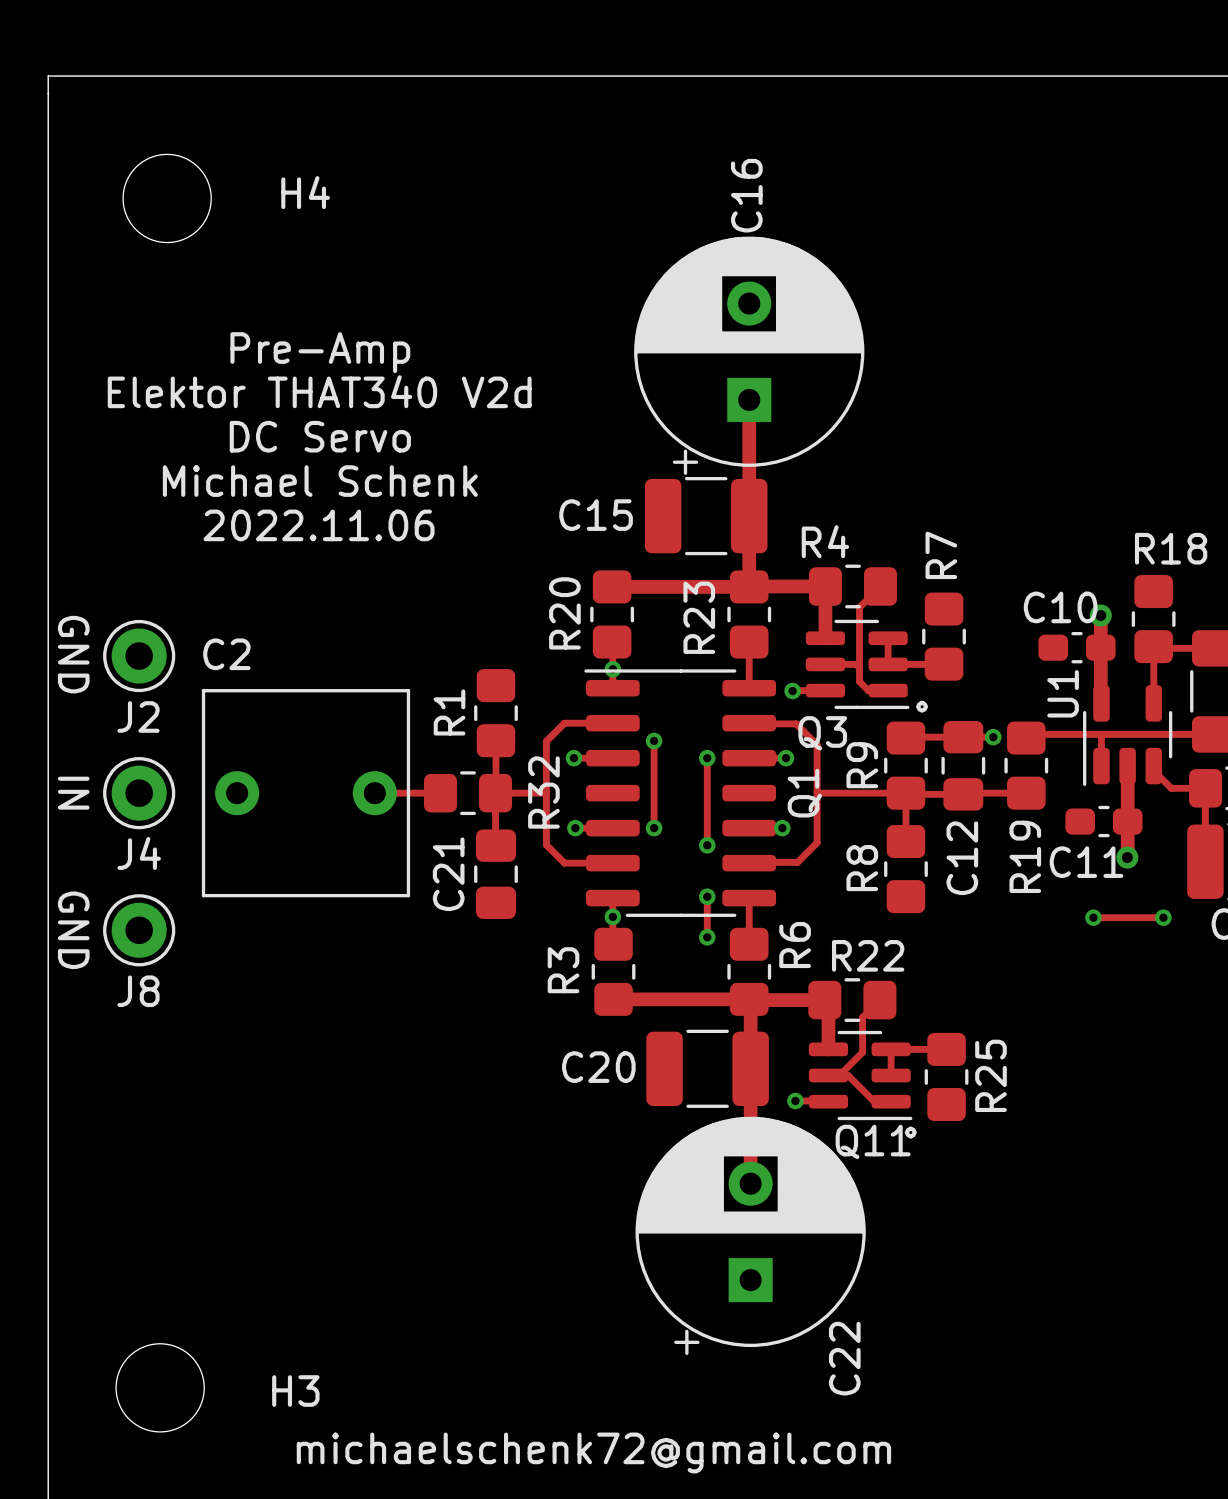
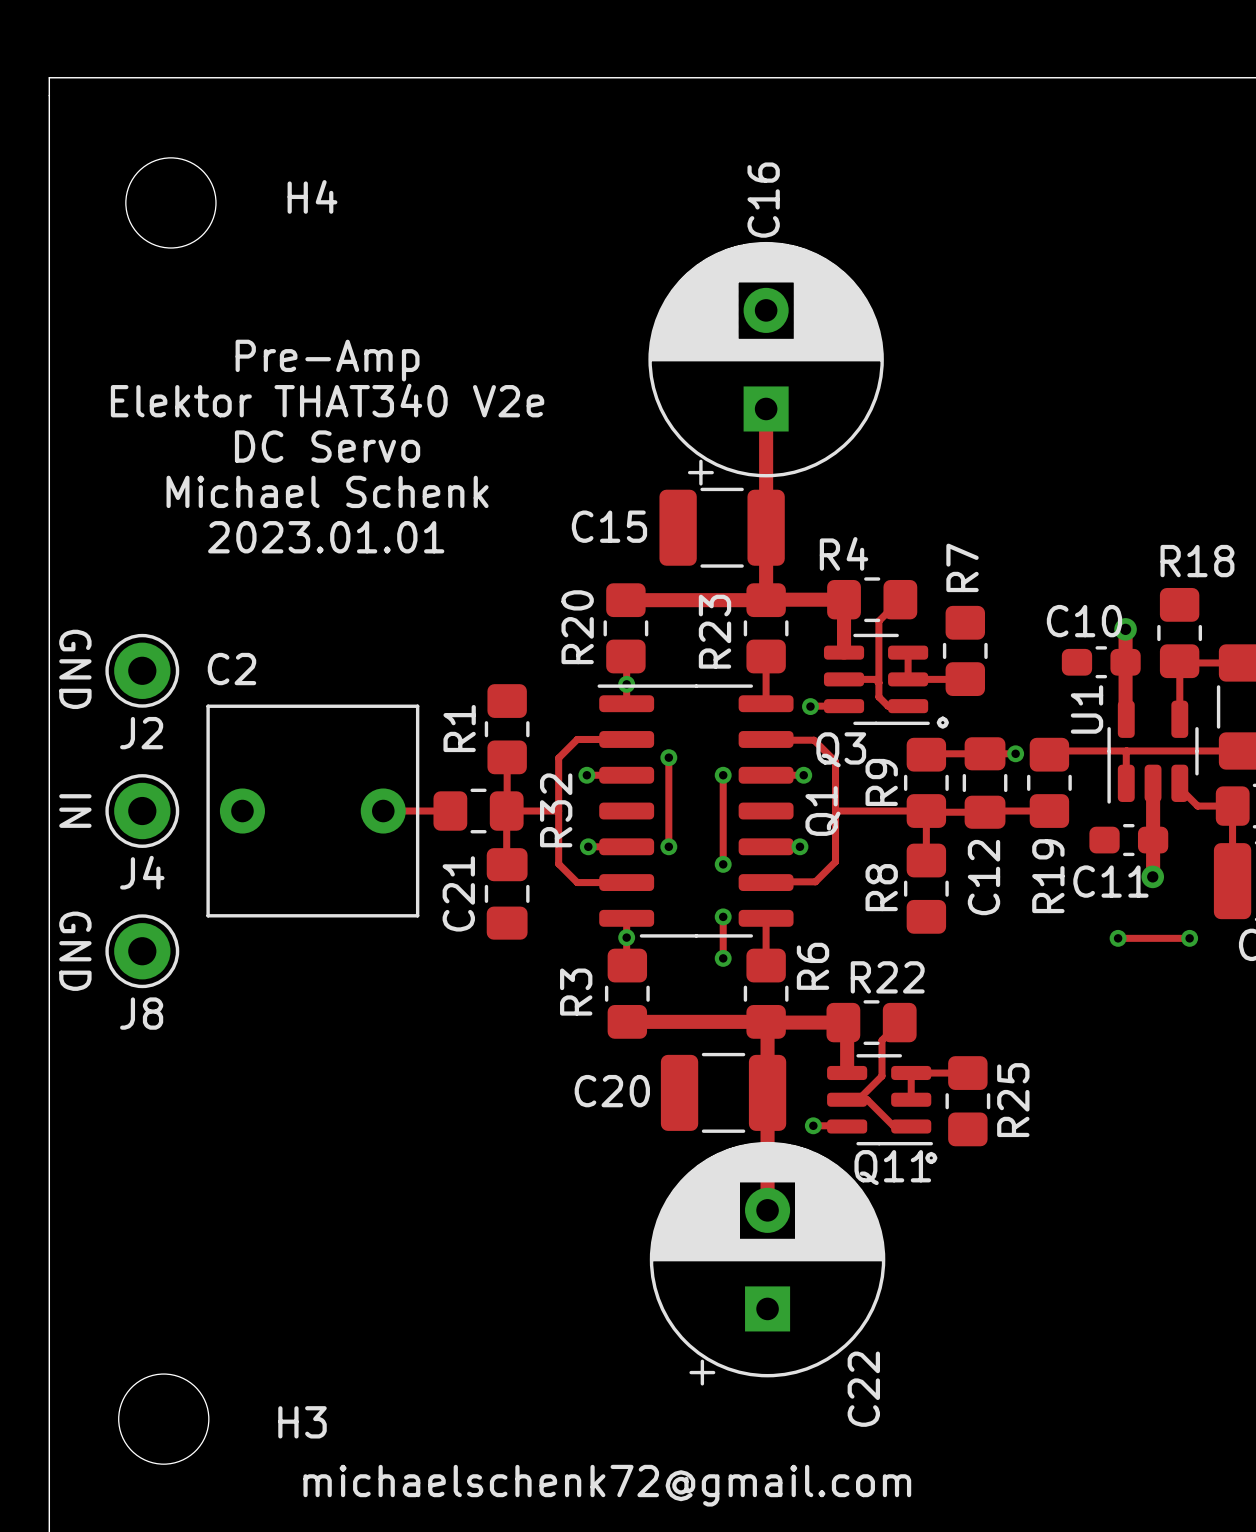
text: Elektor THAT340 V2d (319, 391) -> Elektor THAT340 V2e (327, 400)
text: 2022.11.06 (319, 525) -> 2023.01.01 (326, 537)

